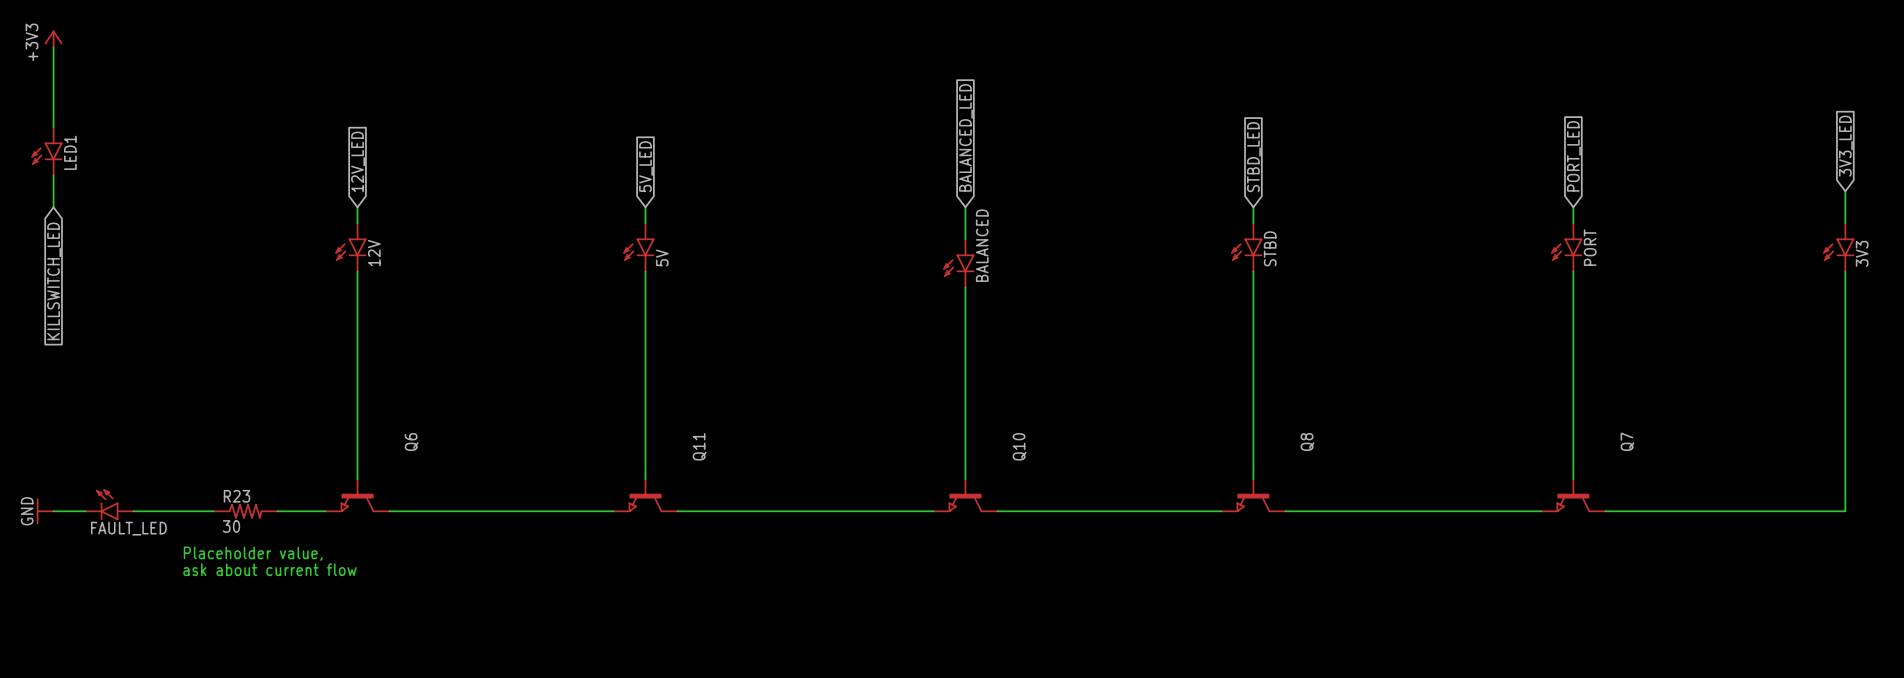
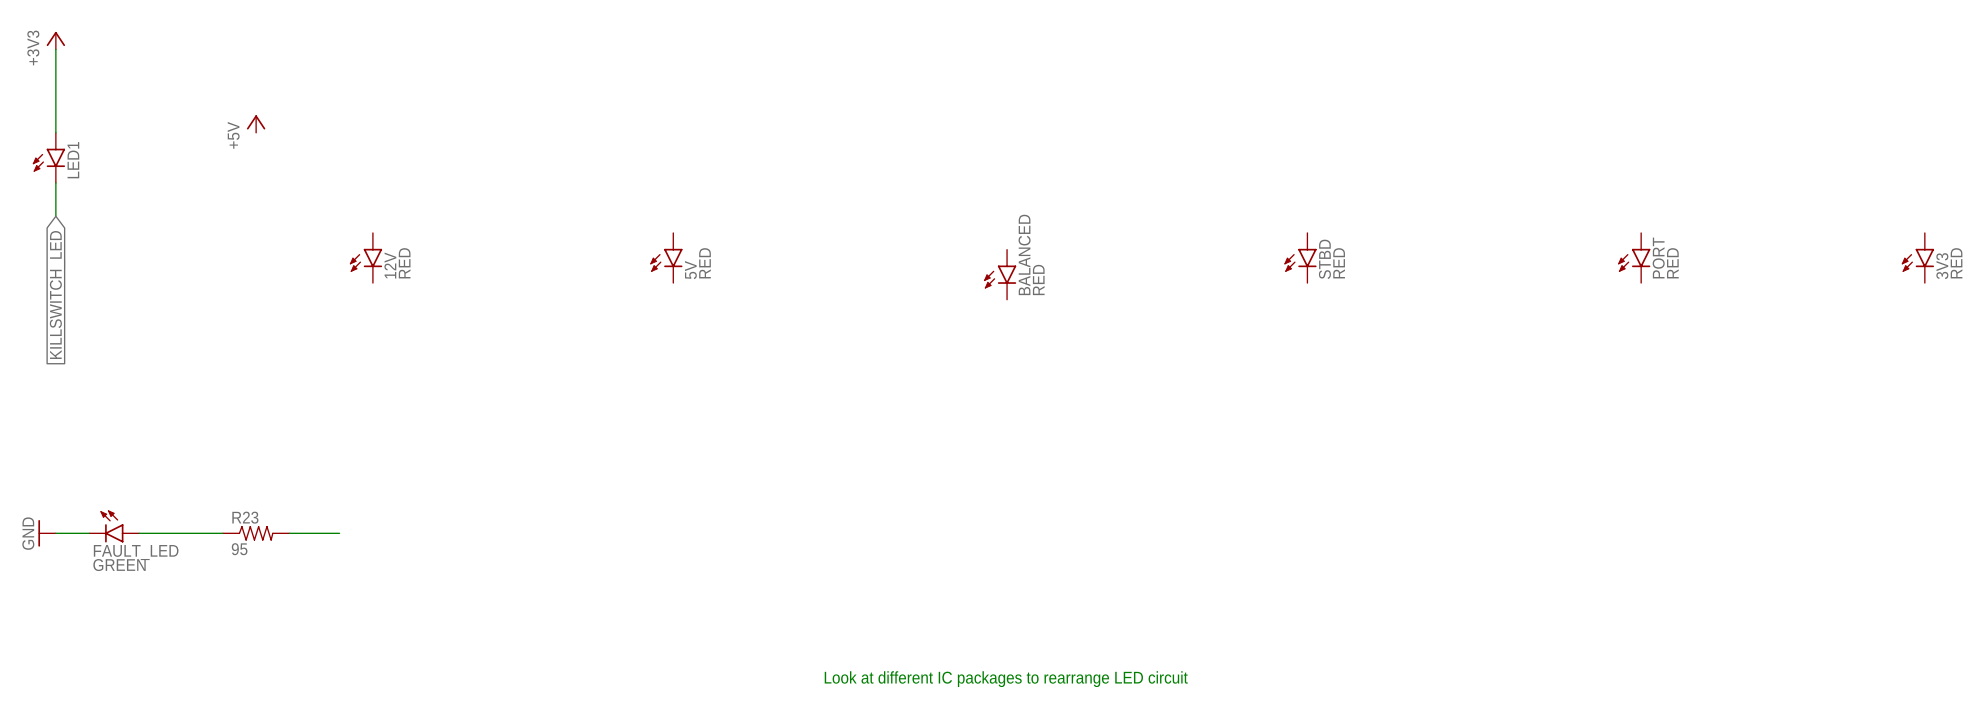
power symbol: none -> +5V (256, 124)
global label: BALANCED_LED (965, 137) -> none
global label: 3V3_LED (1845, 146) -> none
global label: PORT_LED (1573, 156) -> none
global label: STBD_LED (1253, 157) -> none
global label: 12V_LED (358, 161) -> none
global label: 5V_LED (646, 166) -> none
wire: (1845, 191) (1845, 223) -> none
wire: (357, 207) (357, 223) -> none
wire: (645, 207) (645, 223) -> none
wire: (965, 207) (965, 239) -> none
wire: (1253, 207) (1253, 223) -> none
wire: (1573, 207) (1573, 223) -> none
12V value: none -> RED (404, 263)
5V value: none -> RED (705, 263)
STBD value: none -> RED (1339, 263)
PORT value: none -> RED (1672, 263)
3V3 value: none -> RED (1956, 263)
BALANCED value: none -> RED (1038, 279)
wire: (357, 271) (357, 479) -> none
wire: (645, 271) (645, 479) -> none
wire: (1253, 271) (1253, 479) -> none
wire: (1573, 271) (1573, 479) -> none
wire: (1845, 271) (1845, 511) (1605, 511) -> none
wire: (965, 287) (965, 479) -> none
Q6: (357, 495) -> none
Q11: (645, 495) -> none
Q10: (965, 495) -> none
Q8: (1253, 495) -> none
Q7: (1573, 495) -> none
wire: (389, 511) (613, 511) -> none
wire: (677, 511) (933, 511) -> none
wire: (997, 511) (1221, 511) -> none
wire: (1285, 511) (1541, 511) -> none
R23 value: 30 (231, 526) -> 95 (239, 549)
FAULT_LED value: none -> GREEN (119, 565)
text: Placeholder value, (253, 553) -> none
text: ask about current flow (269, 569) -> none
text: none -> Look at different IC packages to rearrange LED circuit (1006, 679)

